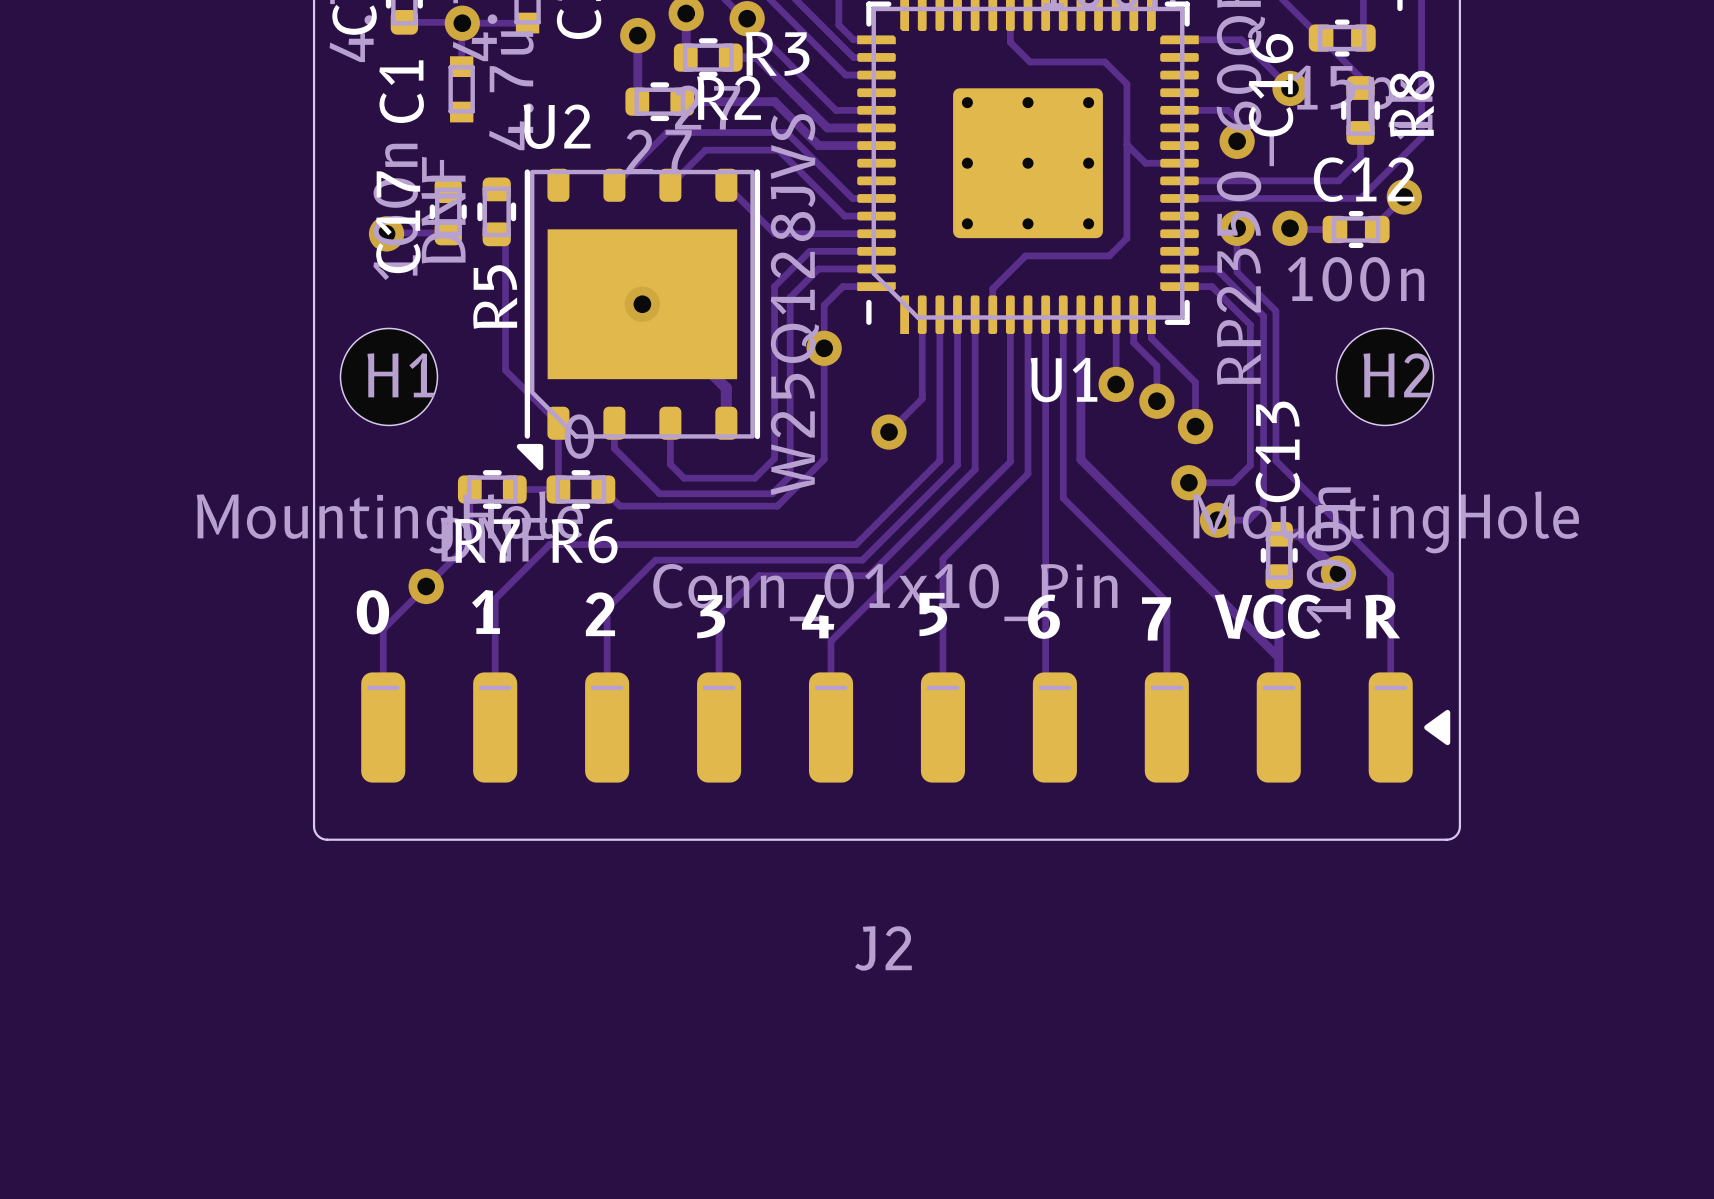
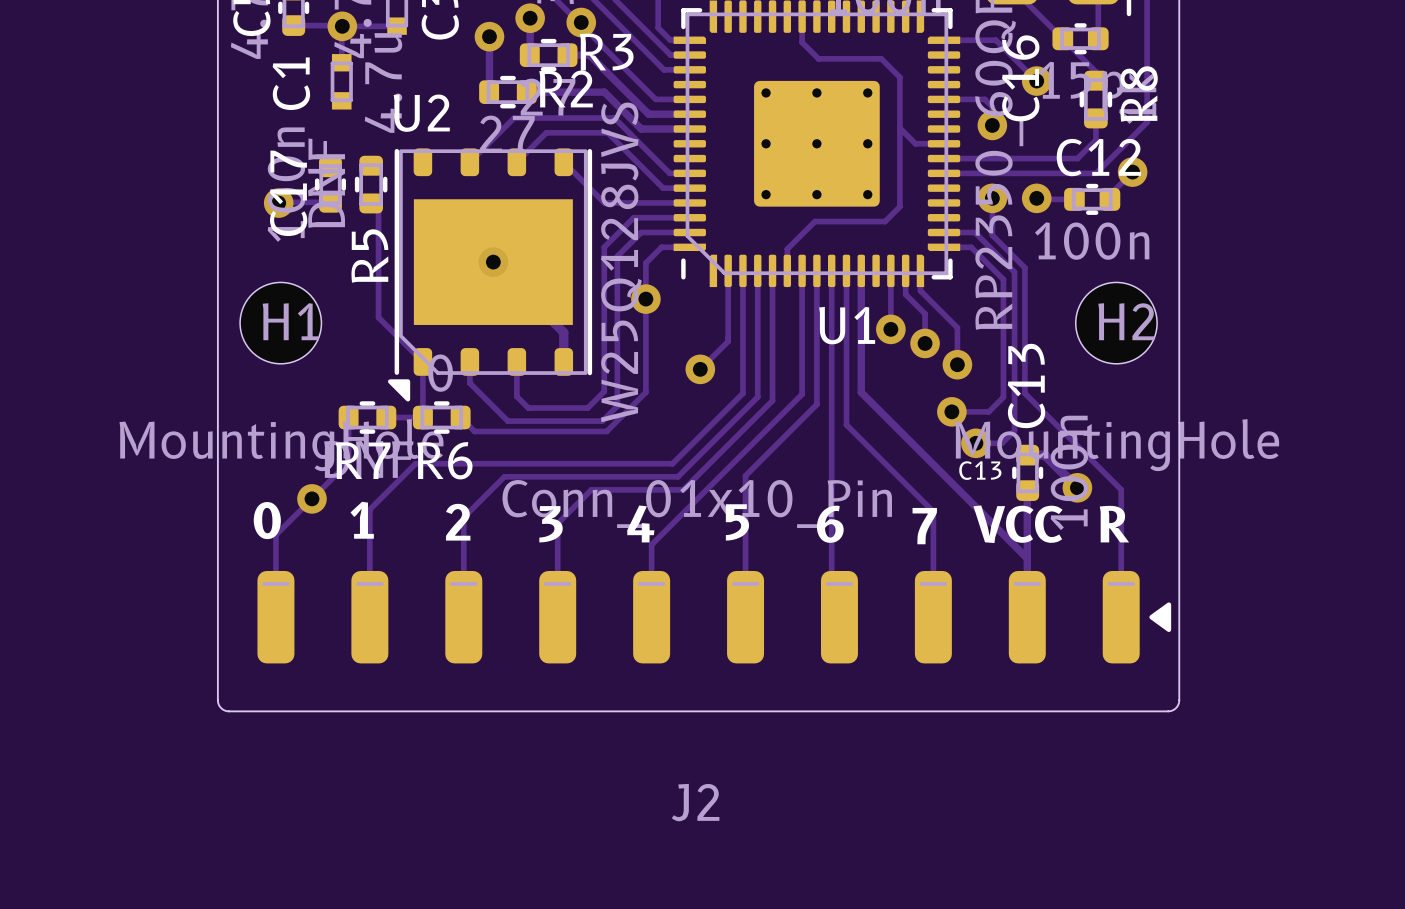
text: none -> C13 (980, 470)

